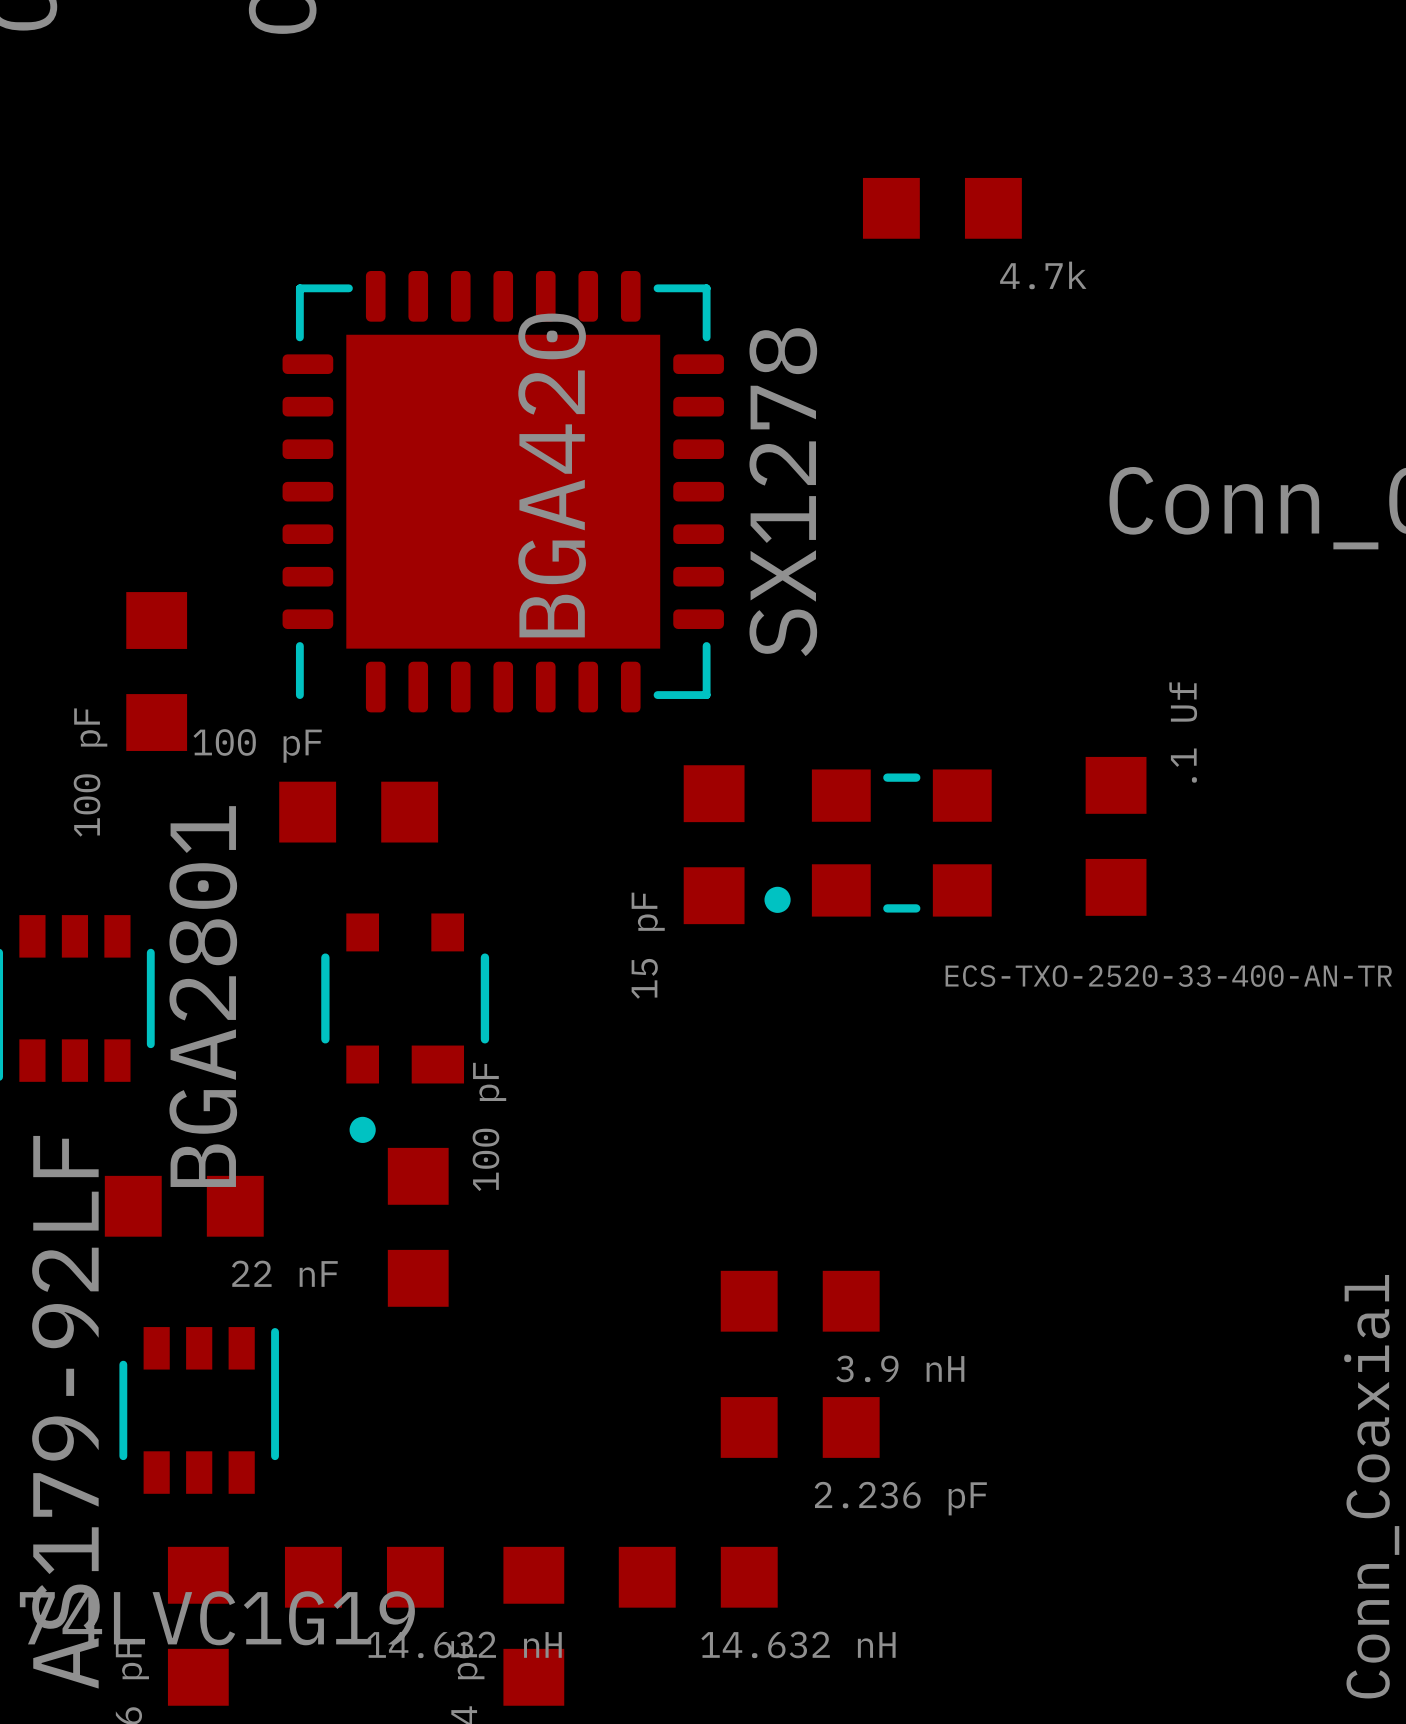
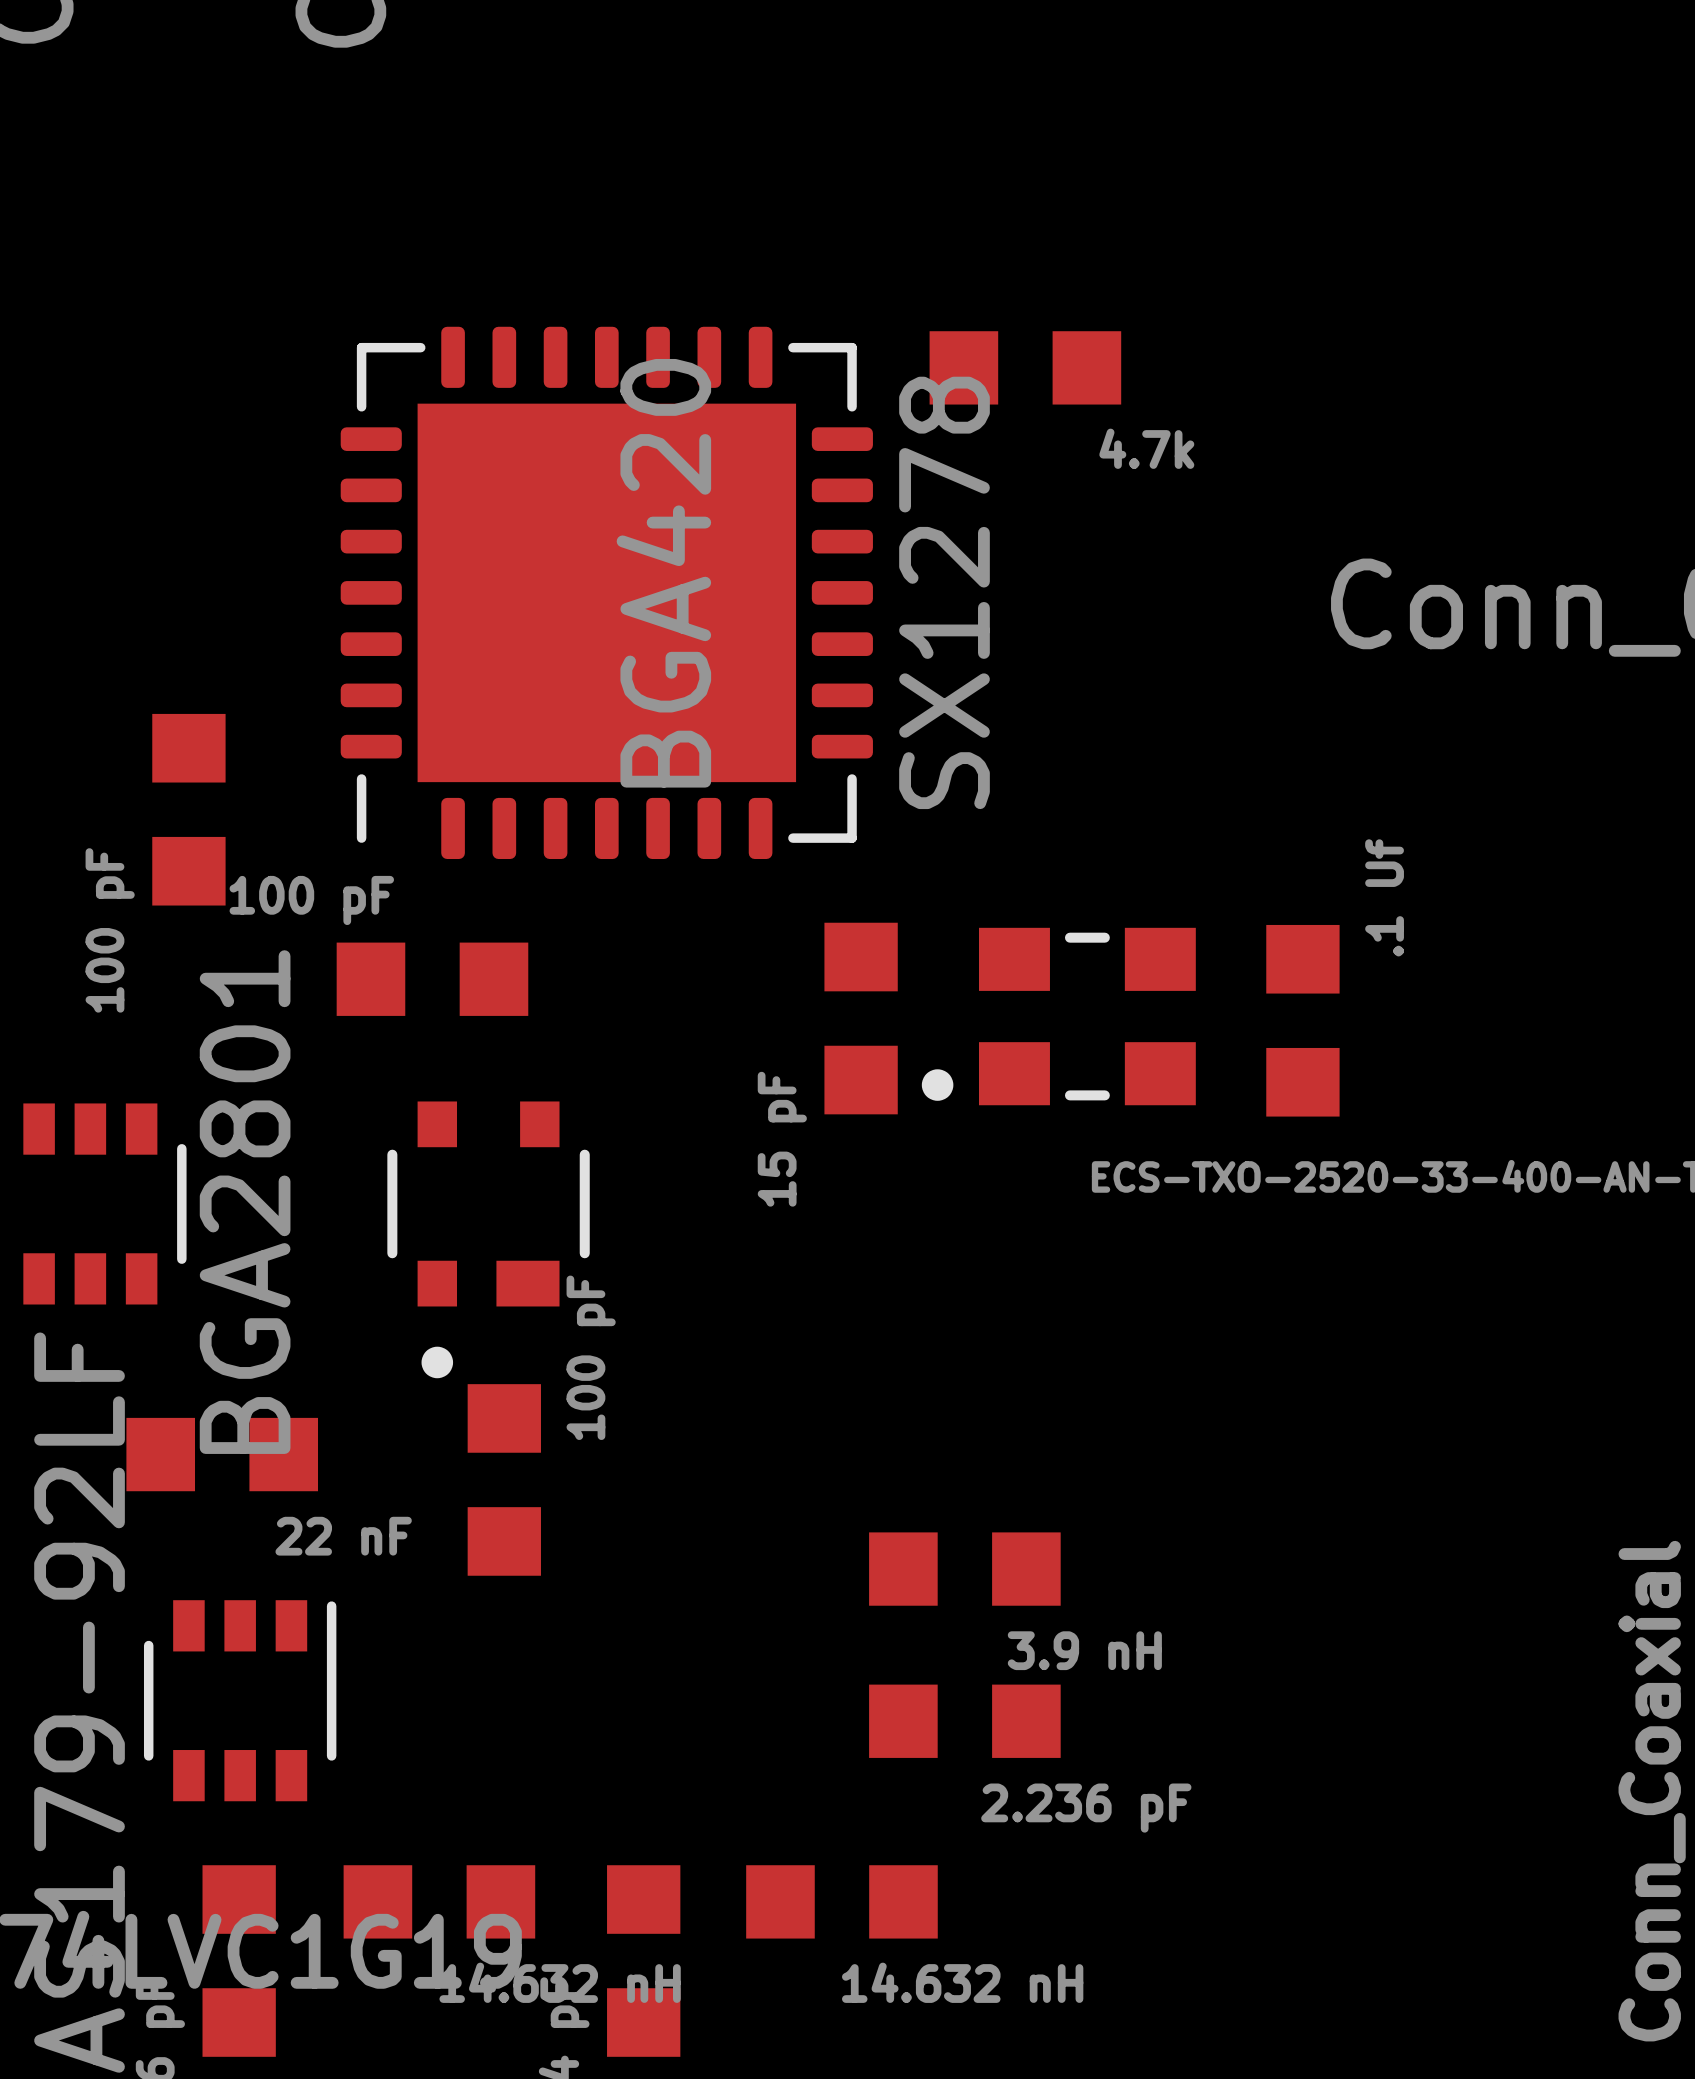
part position: (942, 208) -> (1025, 367)
part position: (1116, 836) -> (1302, 1020)

